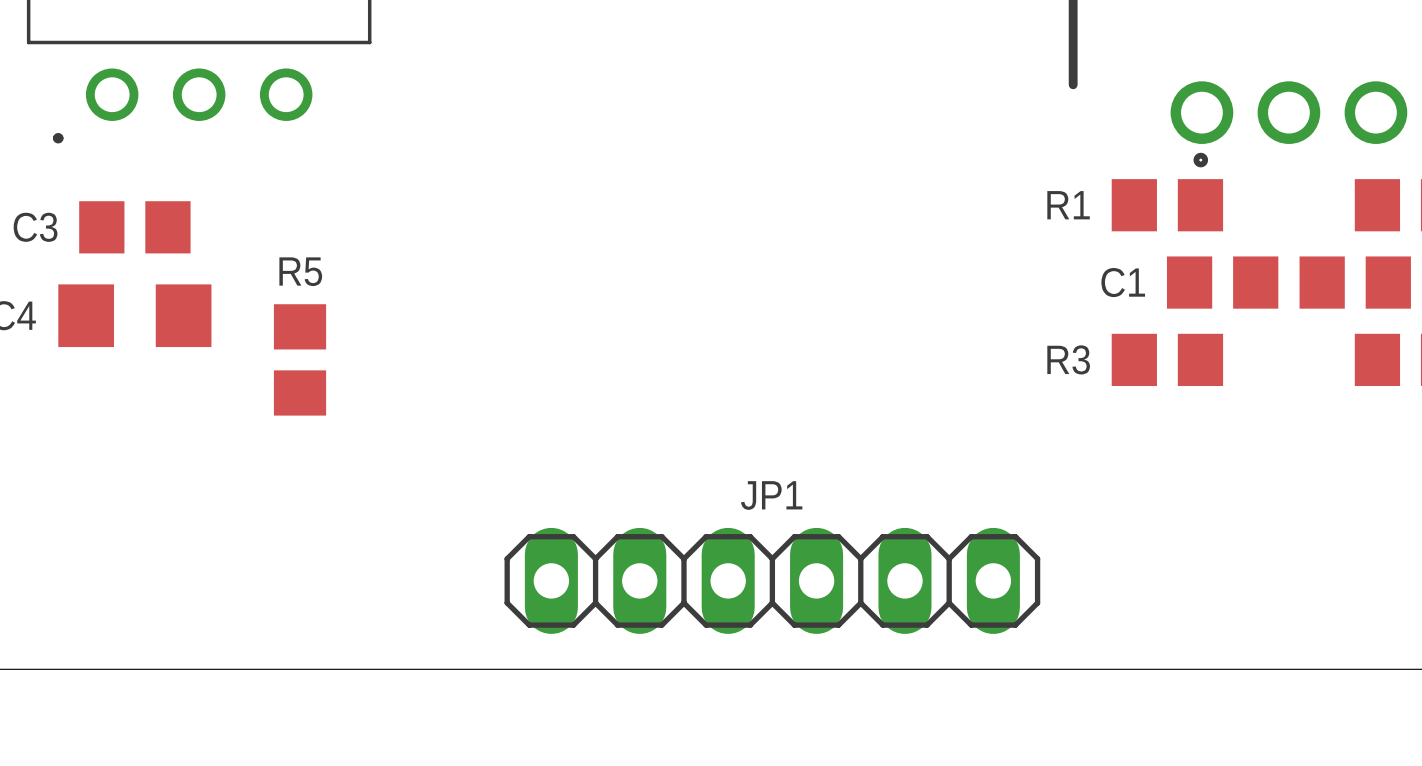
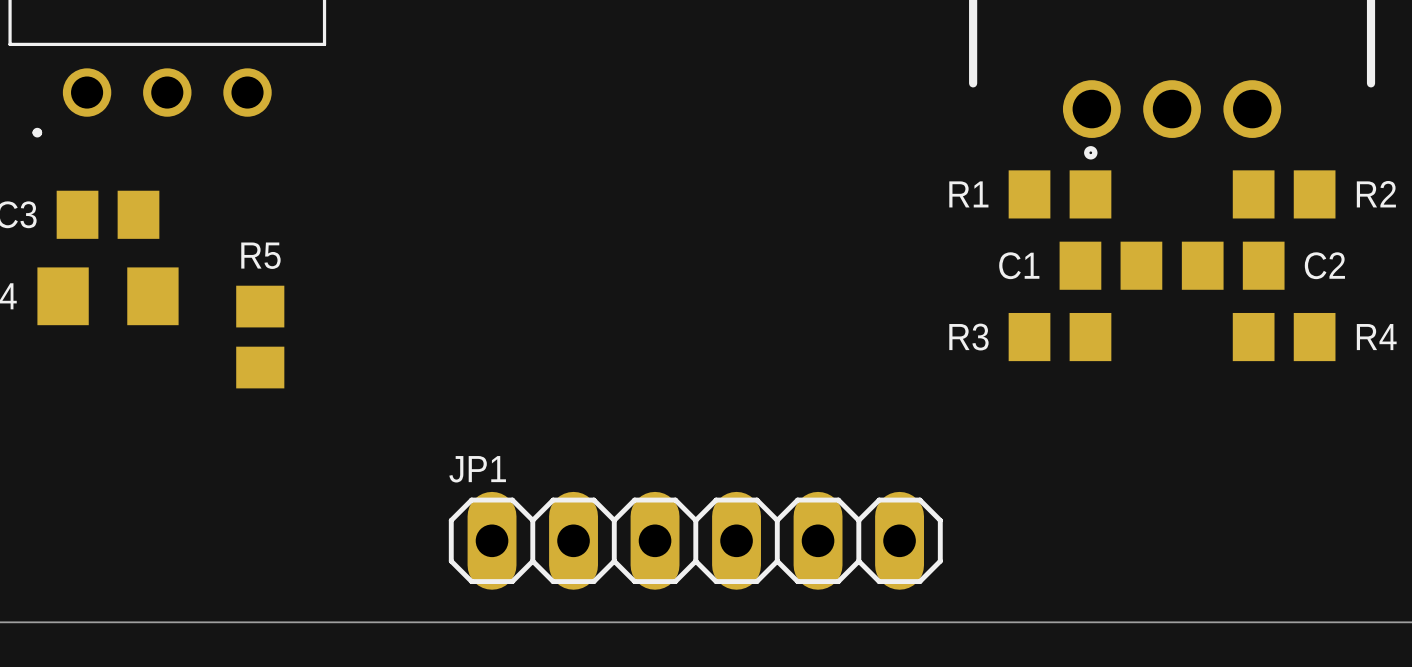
JP1 name position: JP1 (771, 495) -> JP1 (477, 469)

